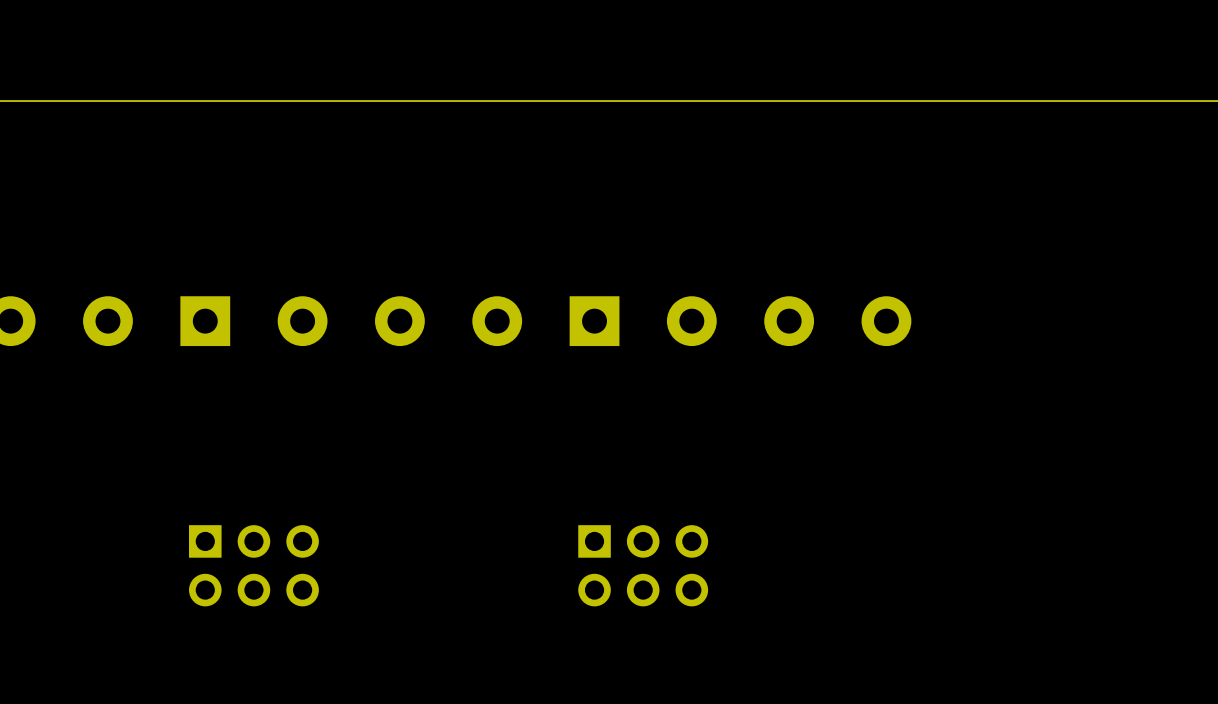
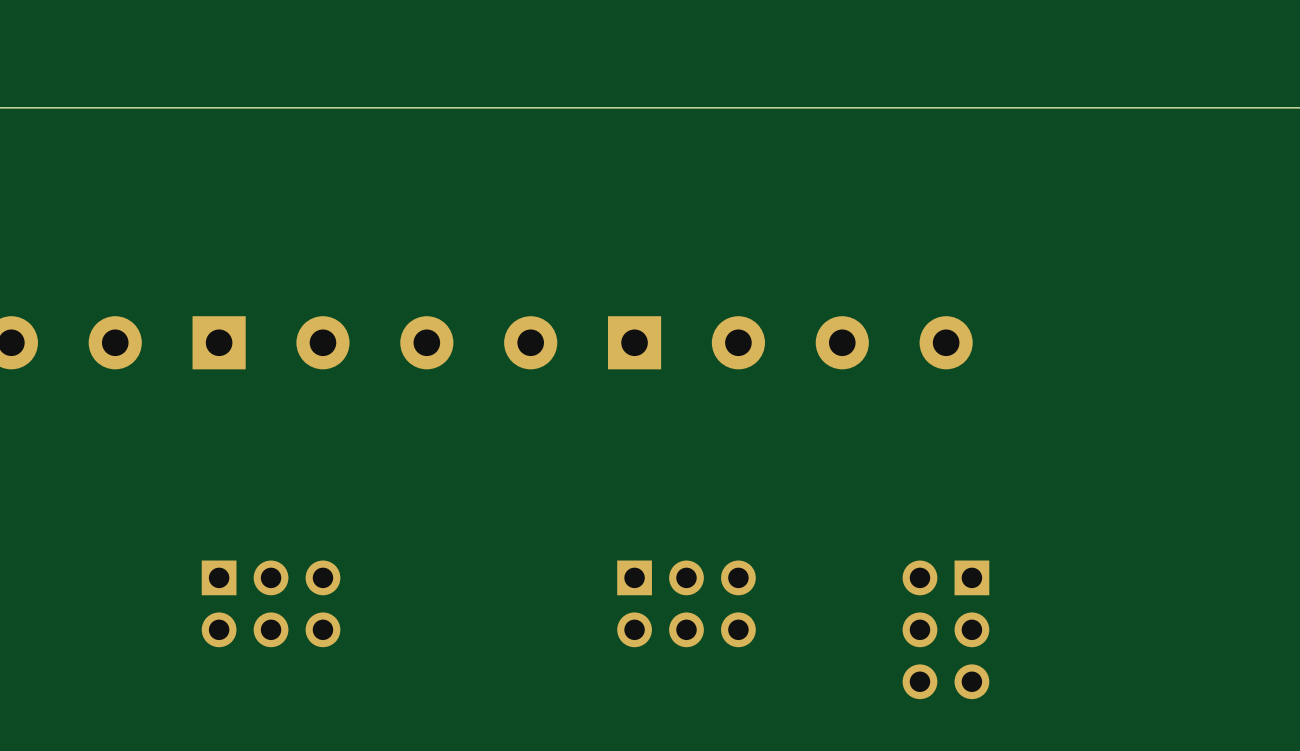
part: none -> (945, 629)

